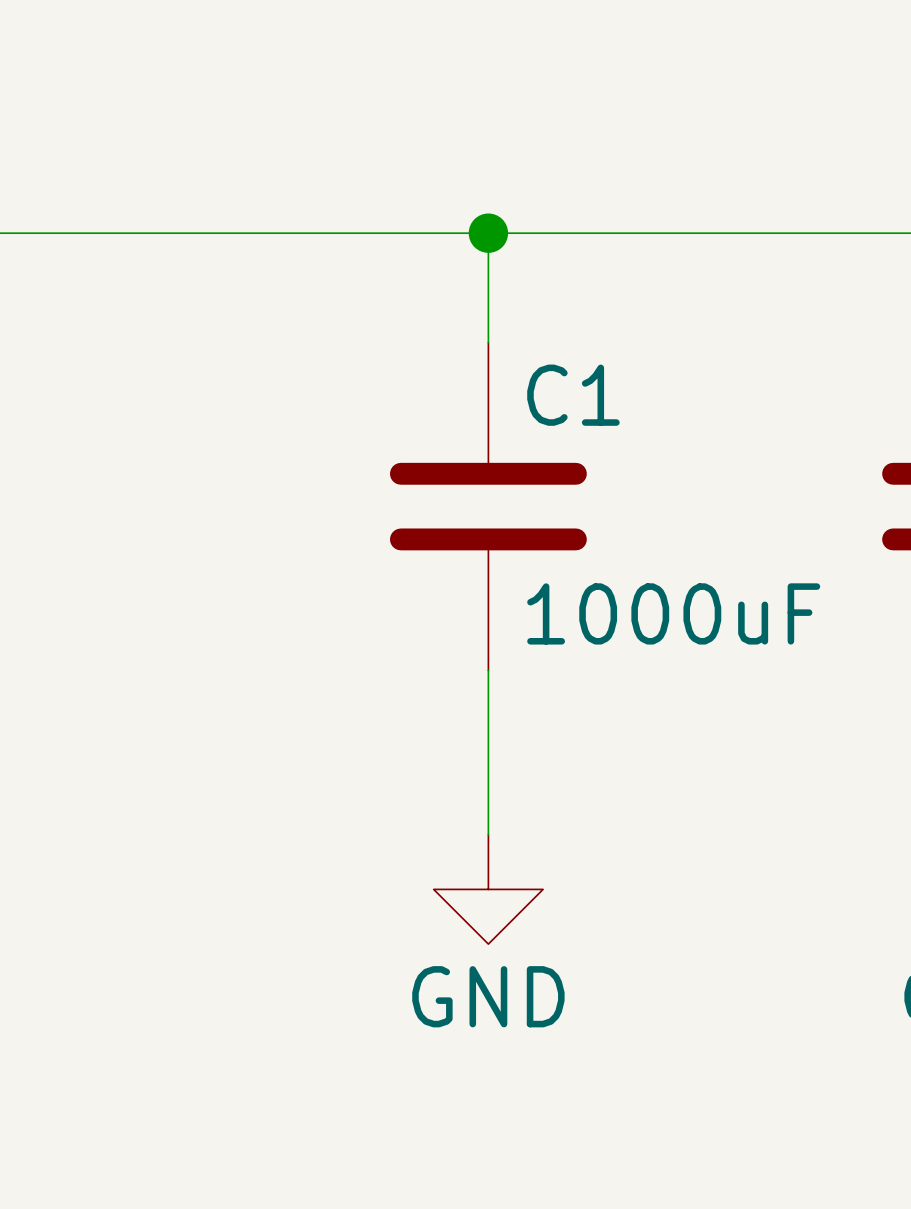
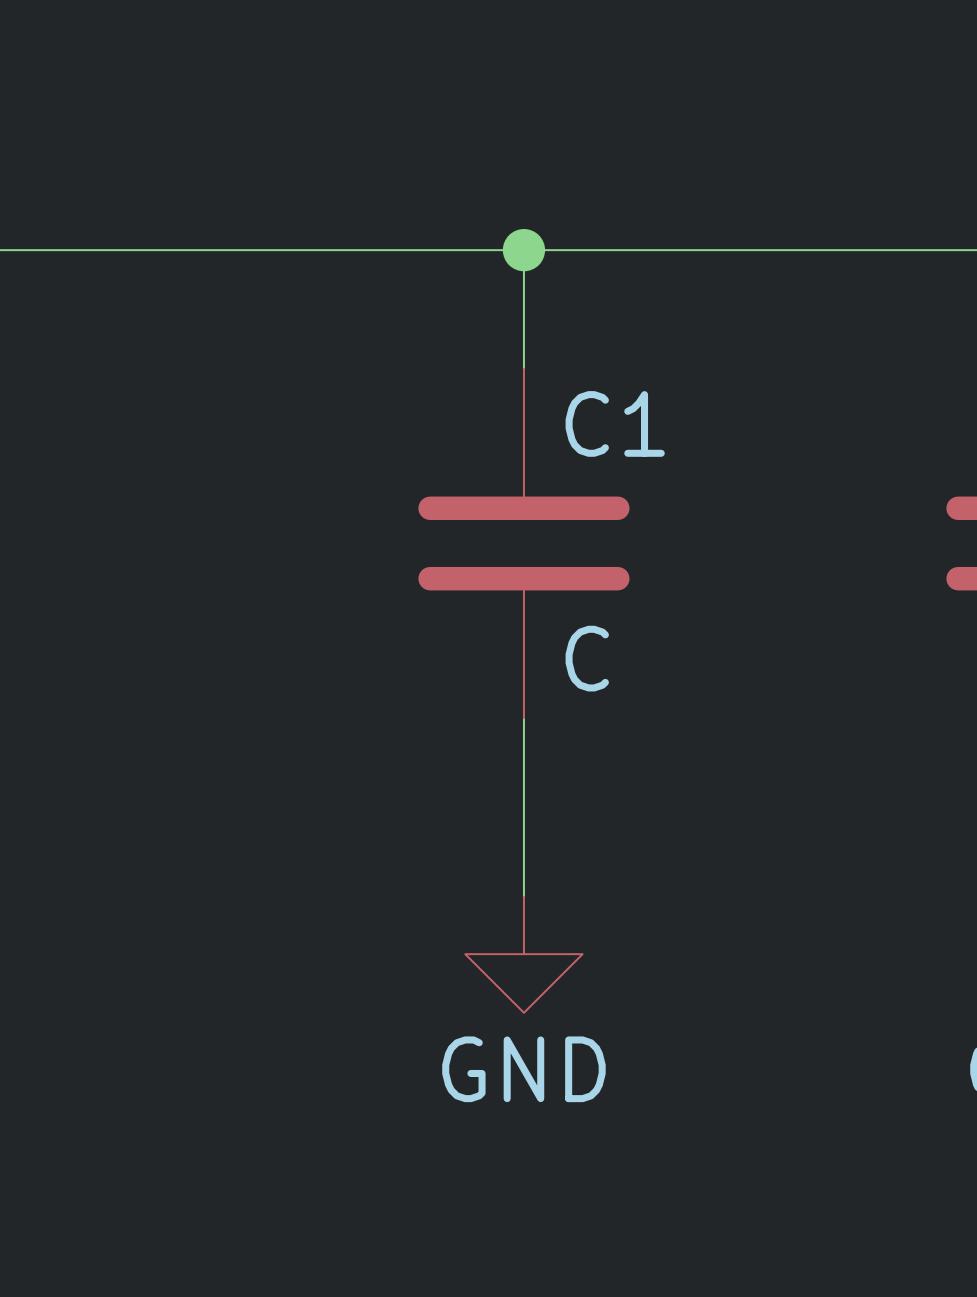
C1 value: 1000uF (673, 613) -> C (587, 658)

